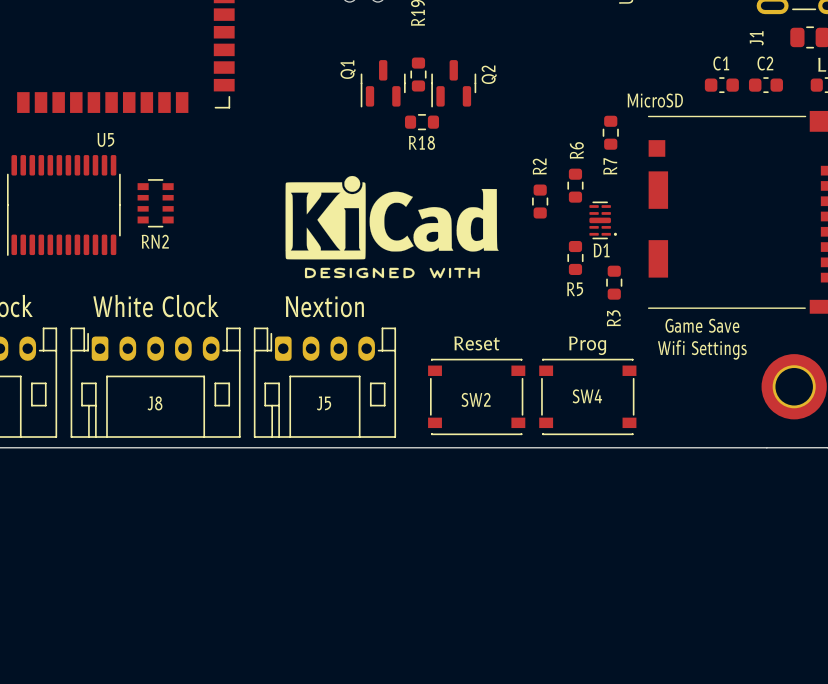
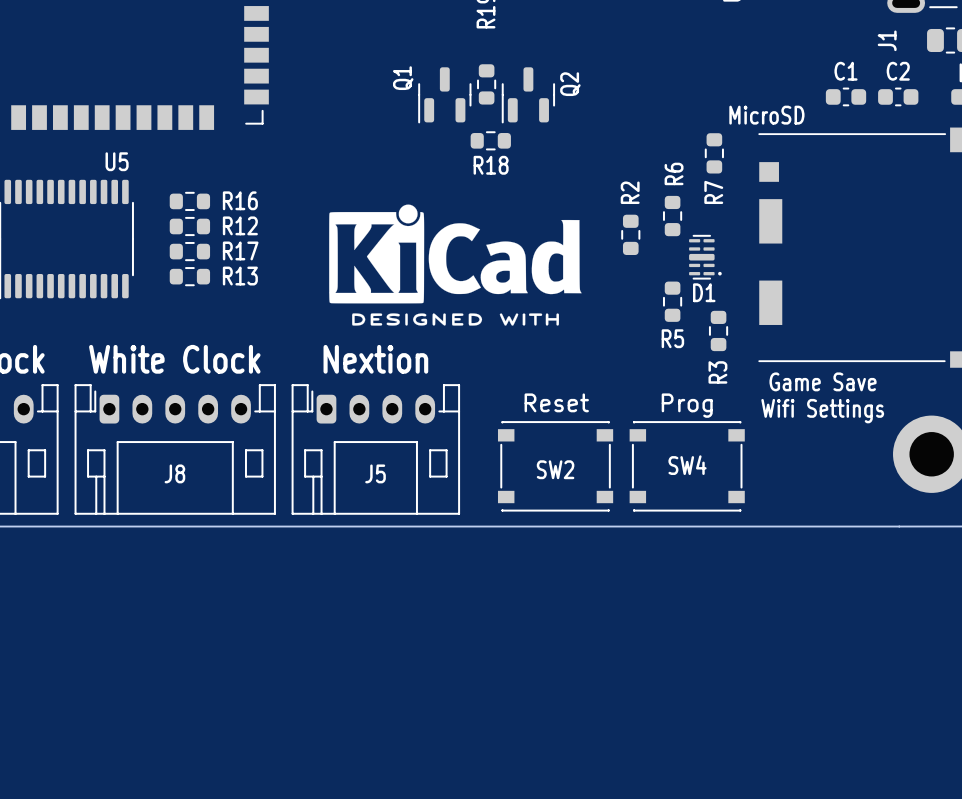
R16: none -> (189, 201)
R12: none -> (189, 226)
RN2: (155, 203) -> none
R17: none -> (189, 251)
R13: none -> (189, 276)

